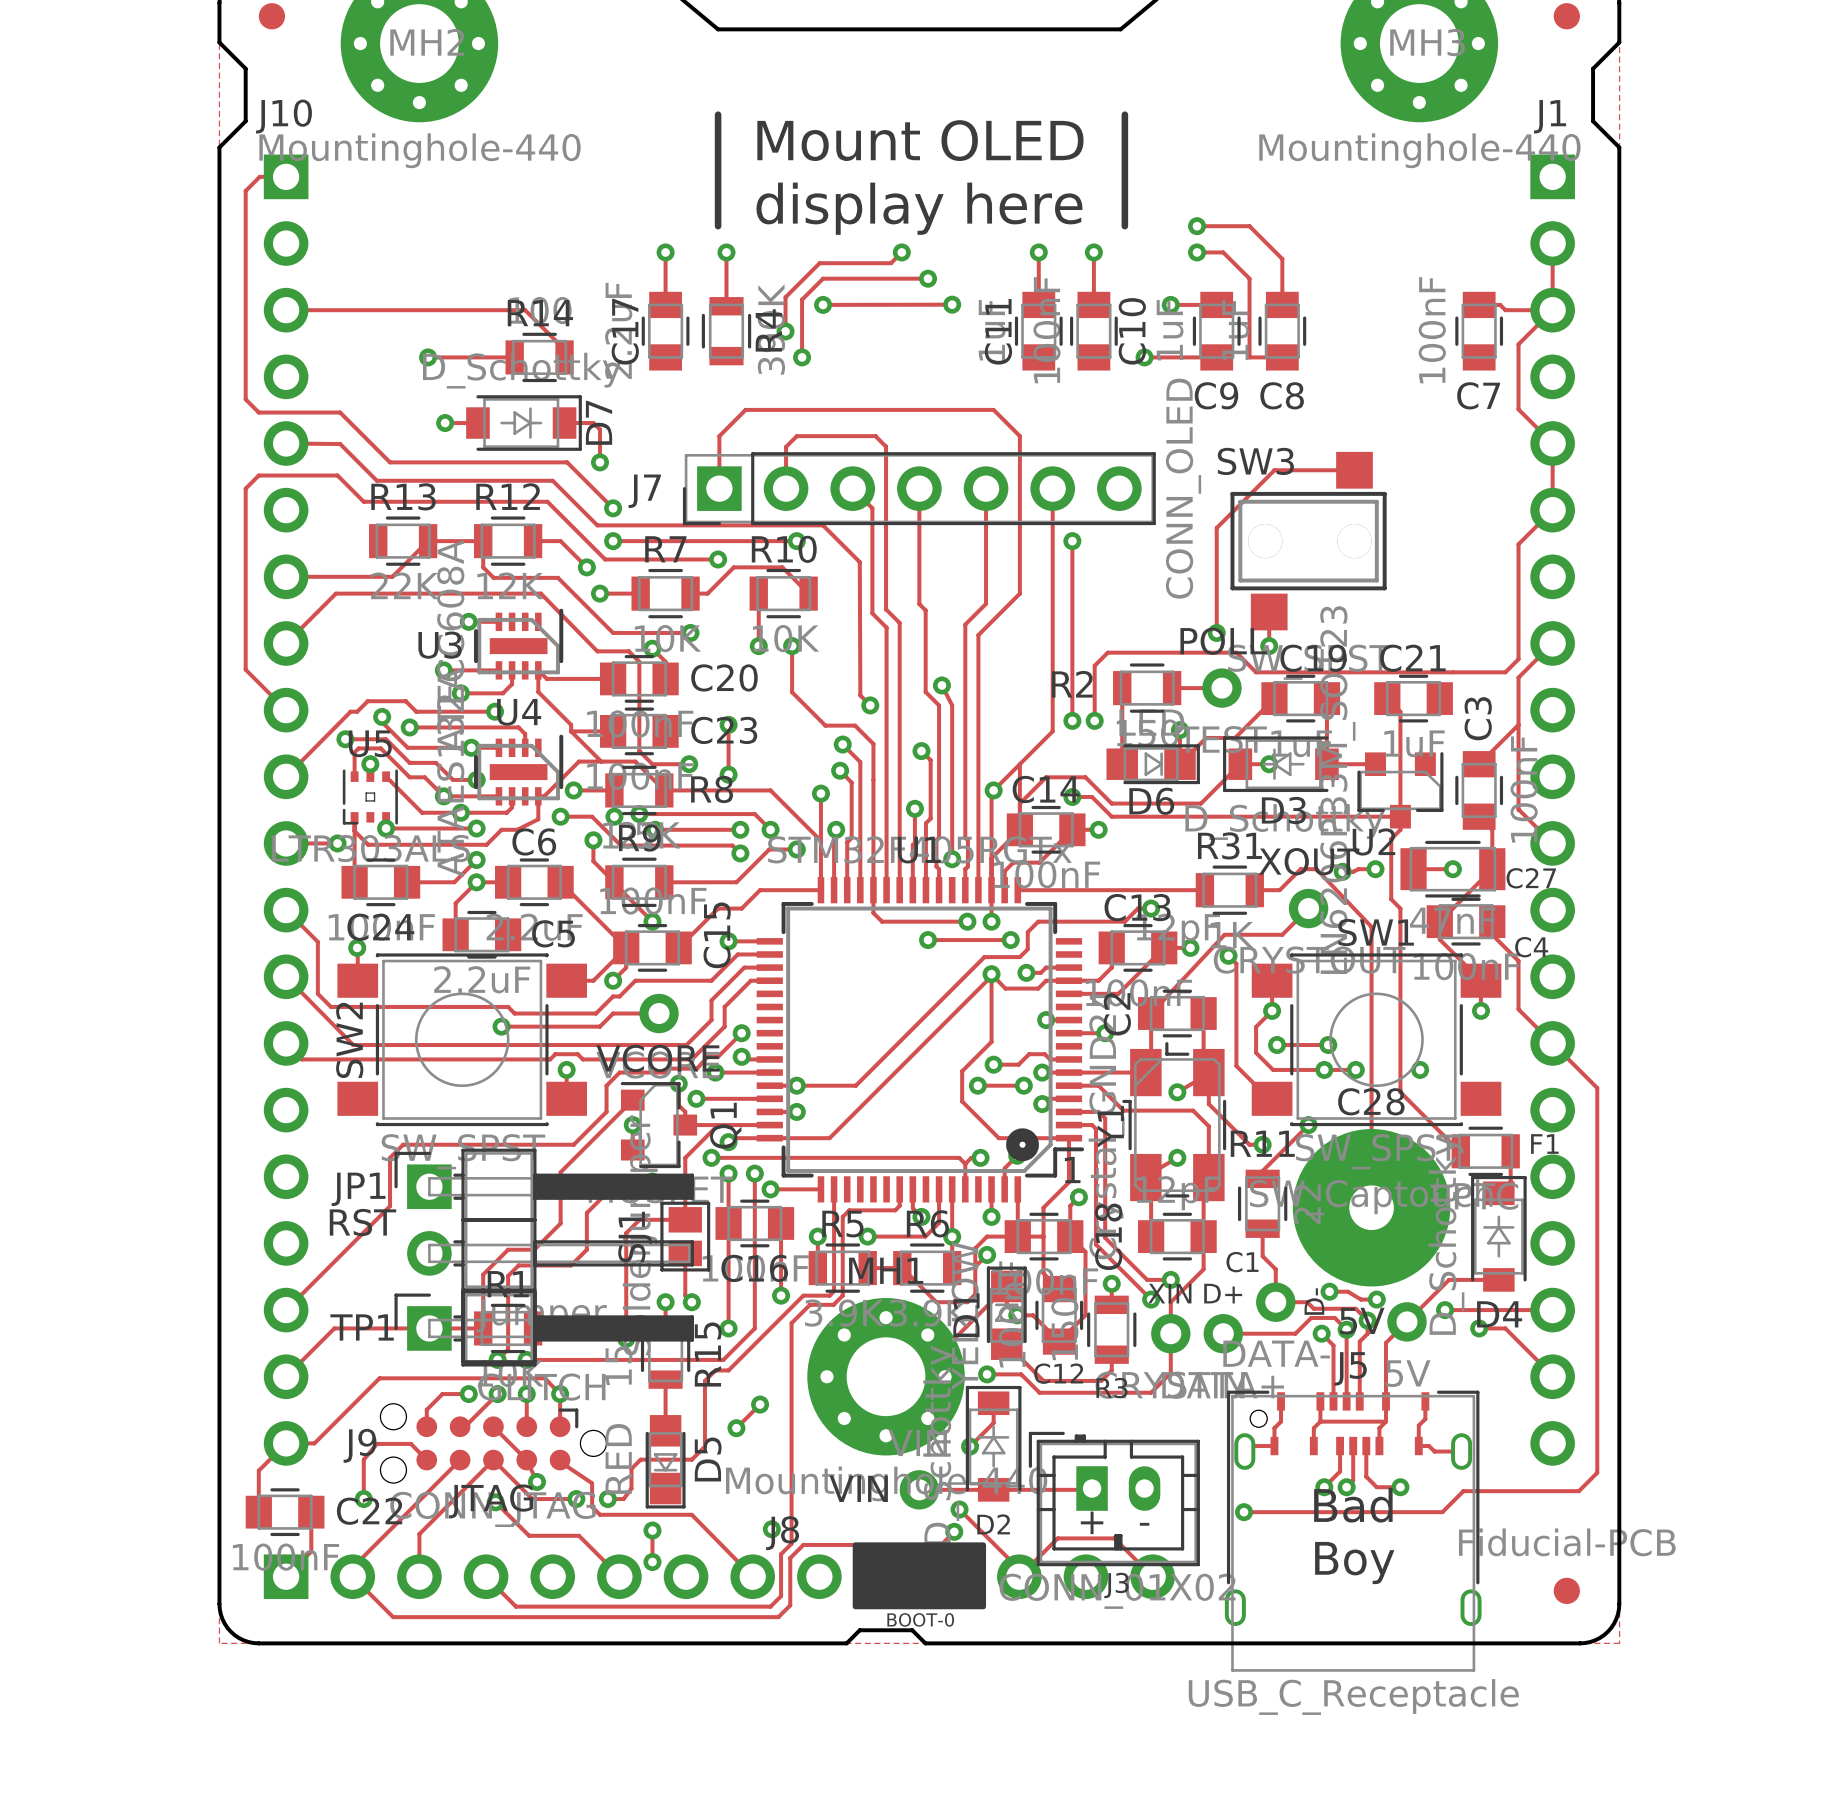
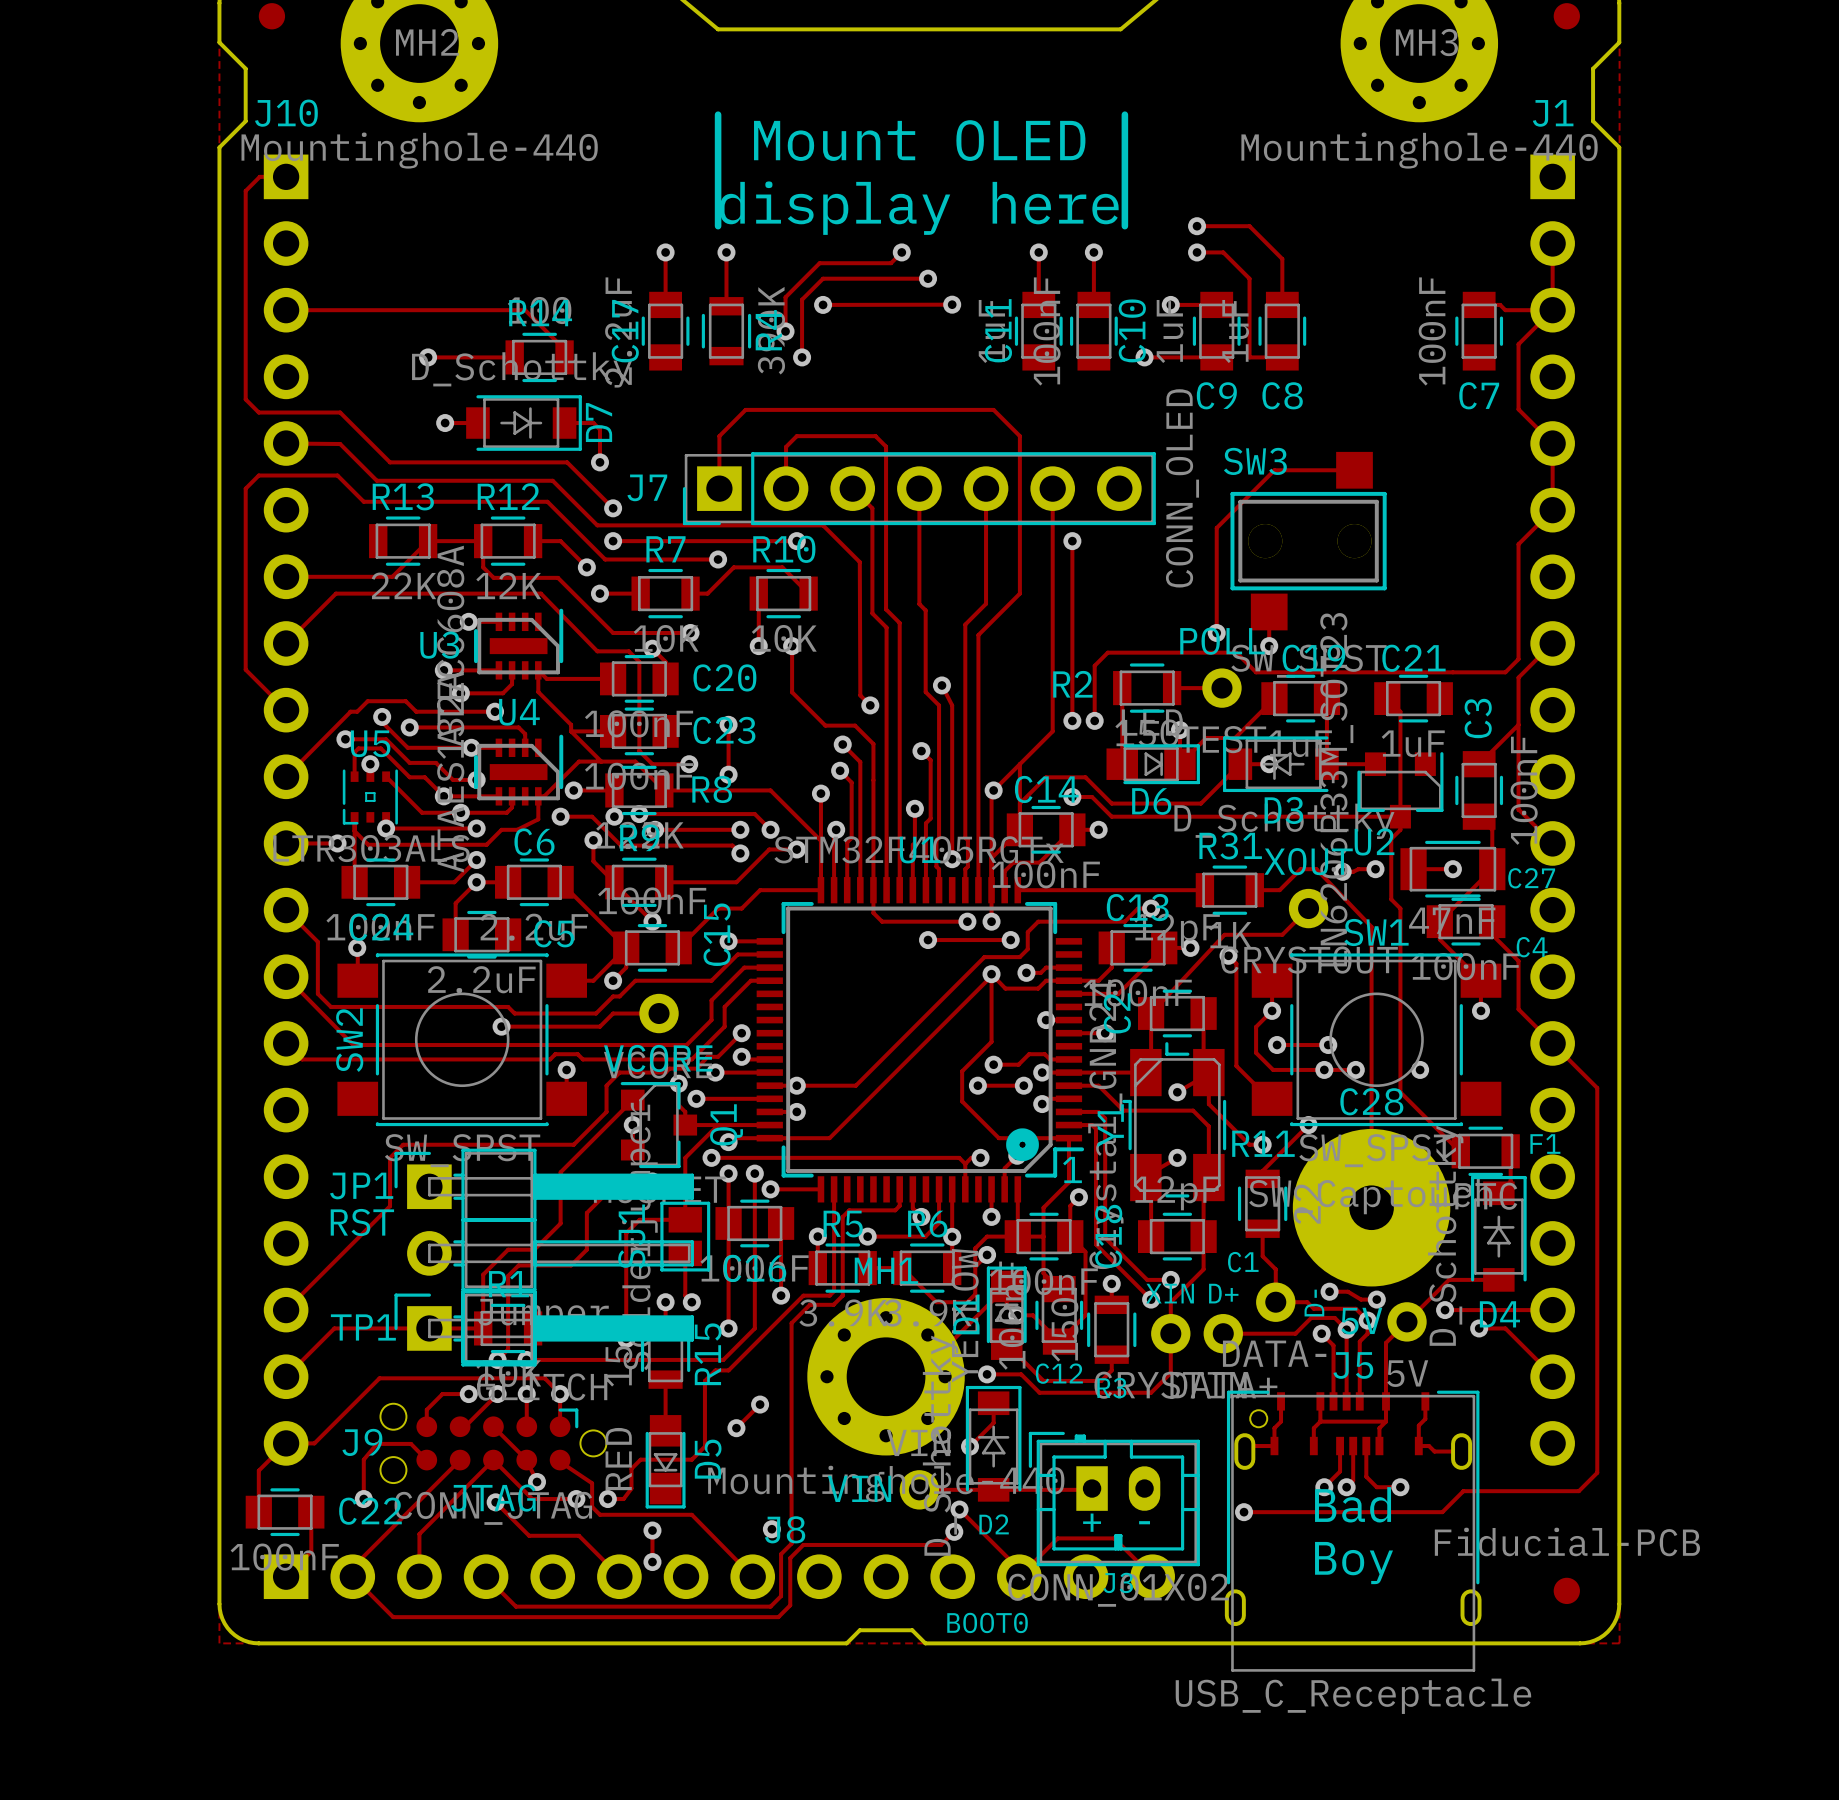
drawing: [852, 1542, 987, 1610] -> none
text: BOOT-0 (920, 1619) -> BOOT0 (987, 1622)

